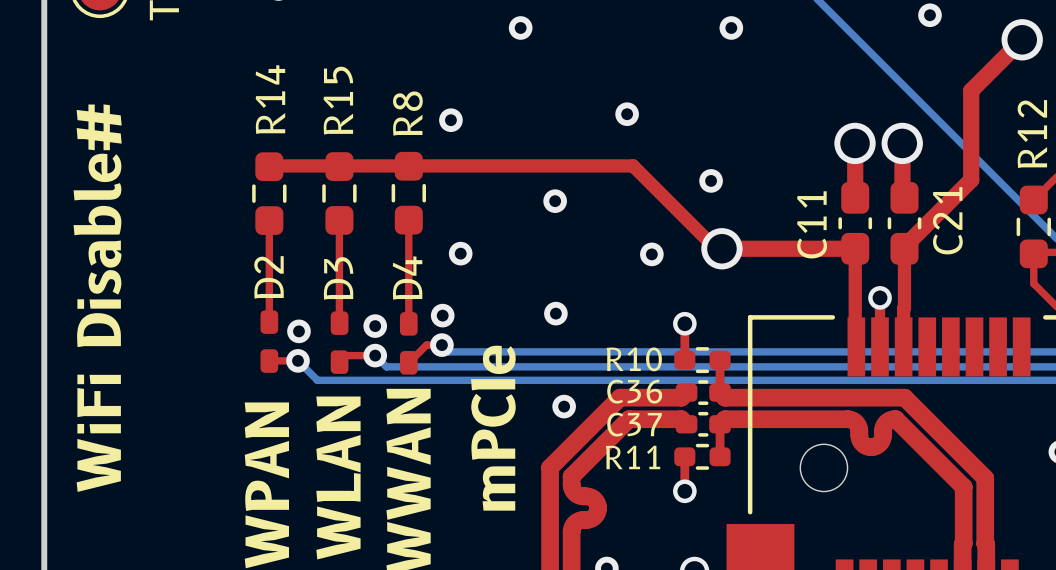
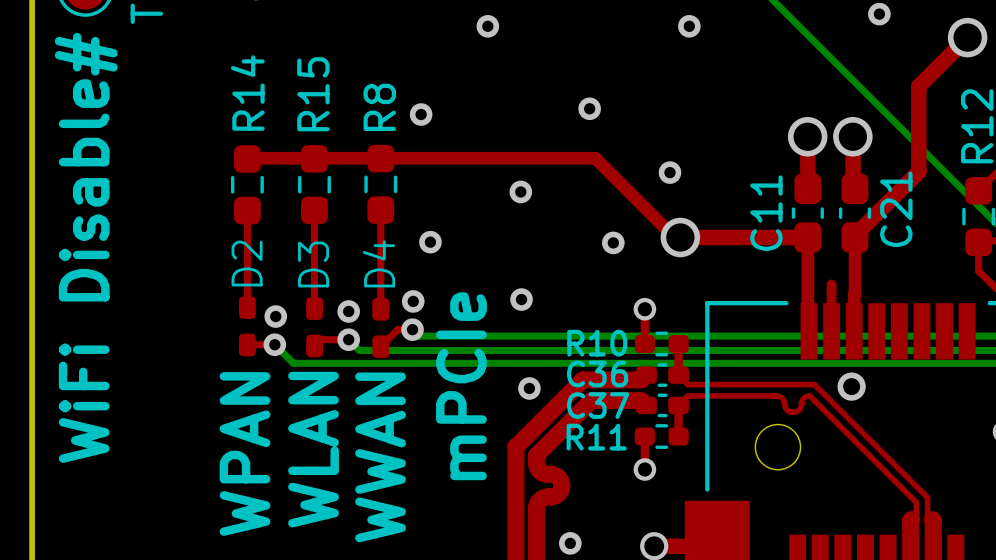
via: (880, 297) -> none
top track: (725, 397) (904, 397) (985, 478) (985, 543) -> (683, 379) (688, 384) (814, 384) (927, 497) (927, 514) (933, 520)
via: none -> (851, 386)
top track: (725, 419) (850, 419) (858, 425) (861, 442) (871, 447) (881, 441) (885, 423) (895, 419) (963, 487) (963, 543) -> (683, 400) (688, 395) (777, 395) (783, 399) (787, 409) (792, 412)
top track: none -> (793, 412) (799, 409) (803, 398) (809, 395) (916, 502) (916, 514) (910, 520)

